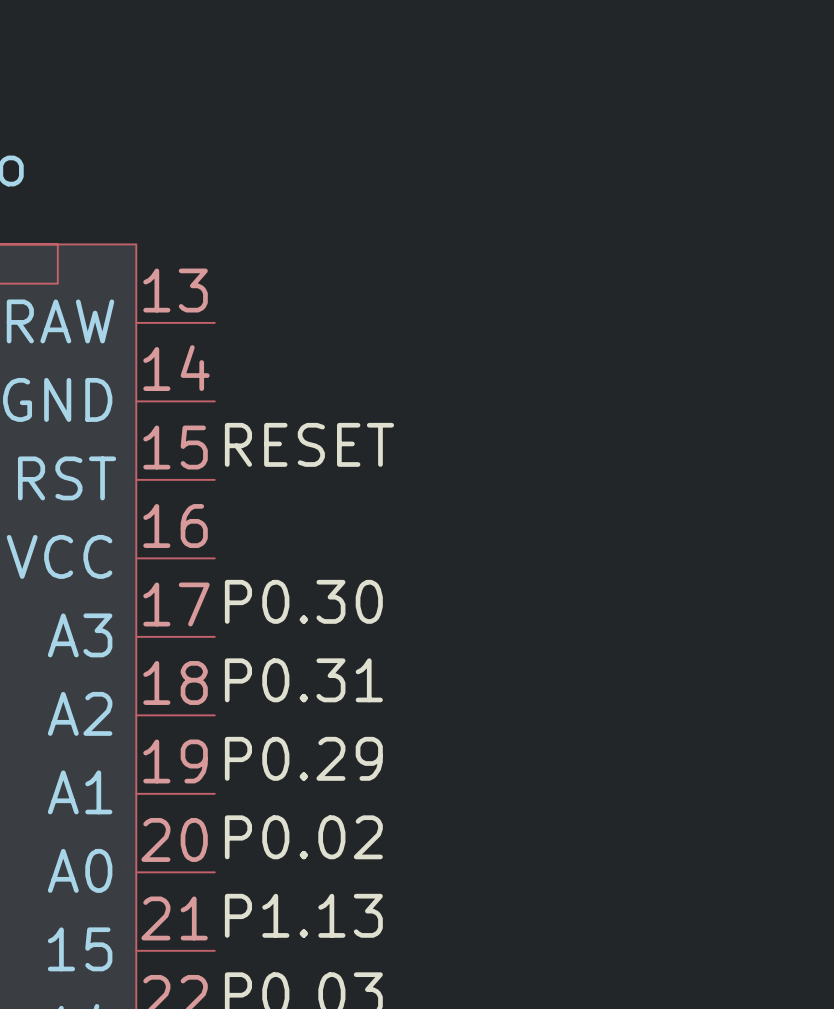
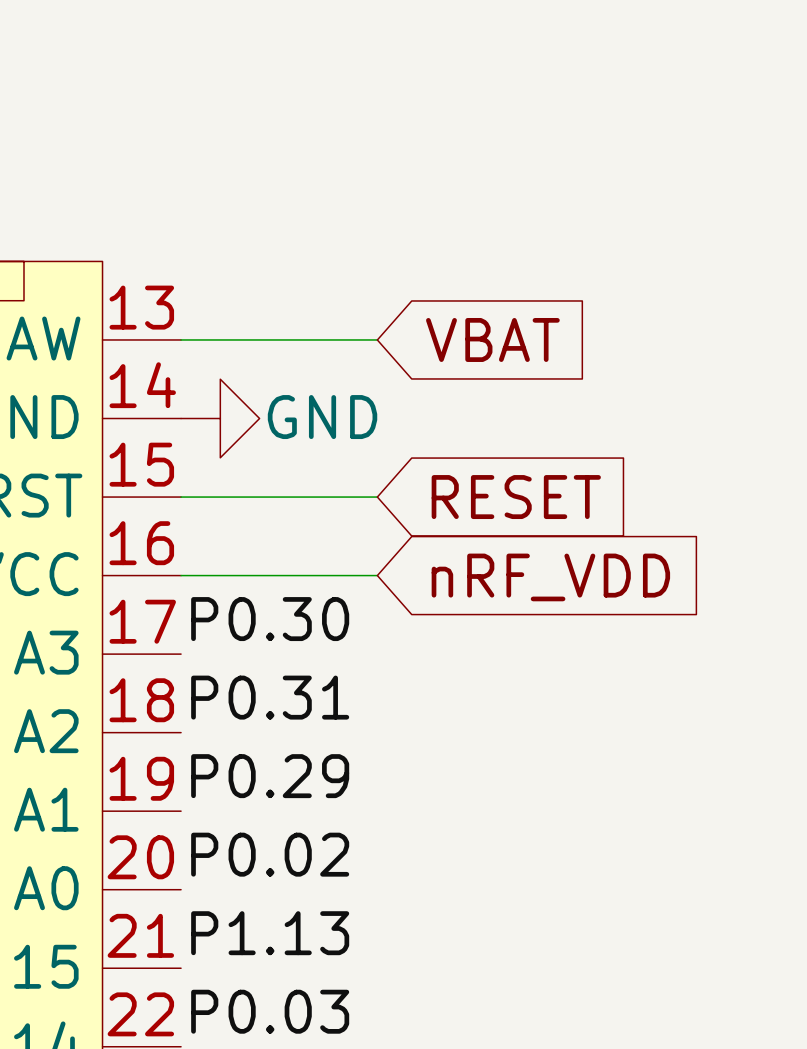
wire: none -> (181, 339) (377, 339)
global label: none -> VBAT (492, 339)
power symbol: none -> GND (220, 418)
label: RESET (309, 444) -> none
wire: none -> (181, 497) (377, 497)
global label: none -> RESET (516, 497)
wire: none -> (181, 575) (377, 575)
global label: none -> nRF_VDD (550, 577)

